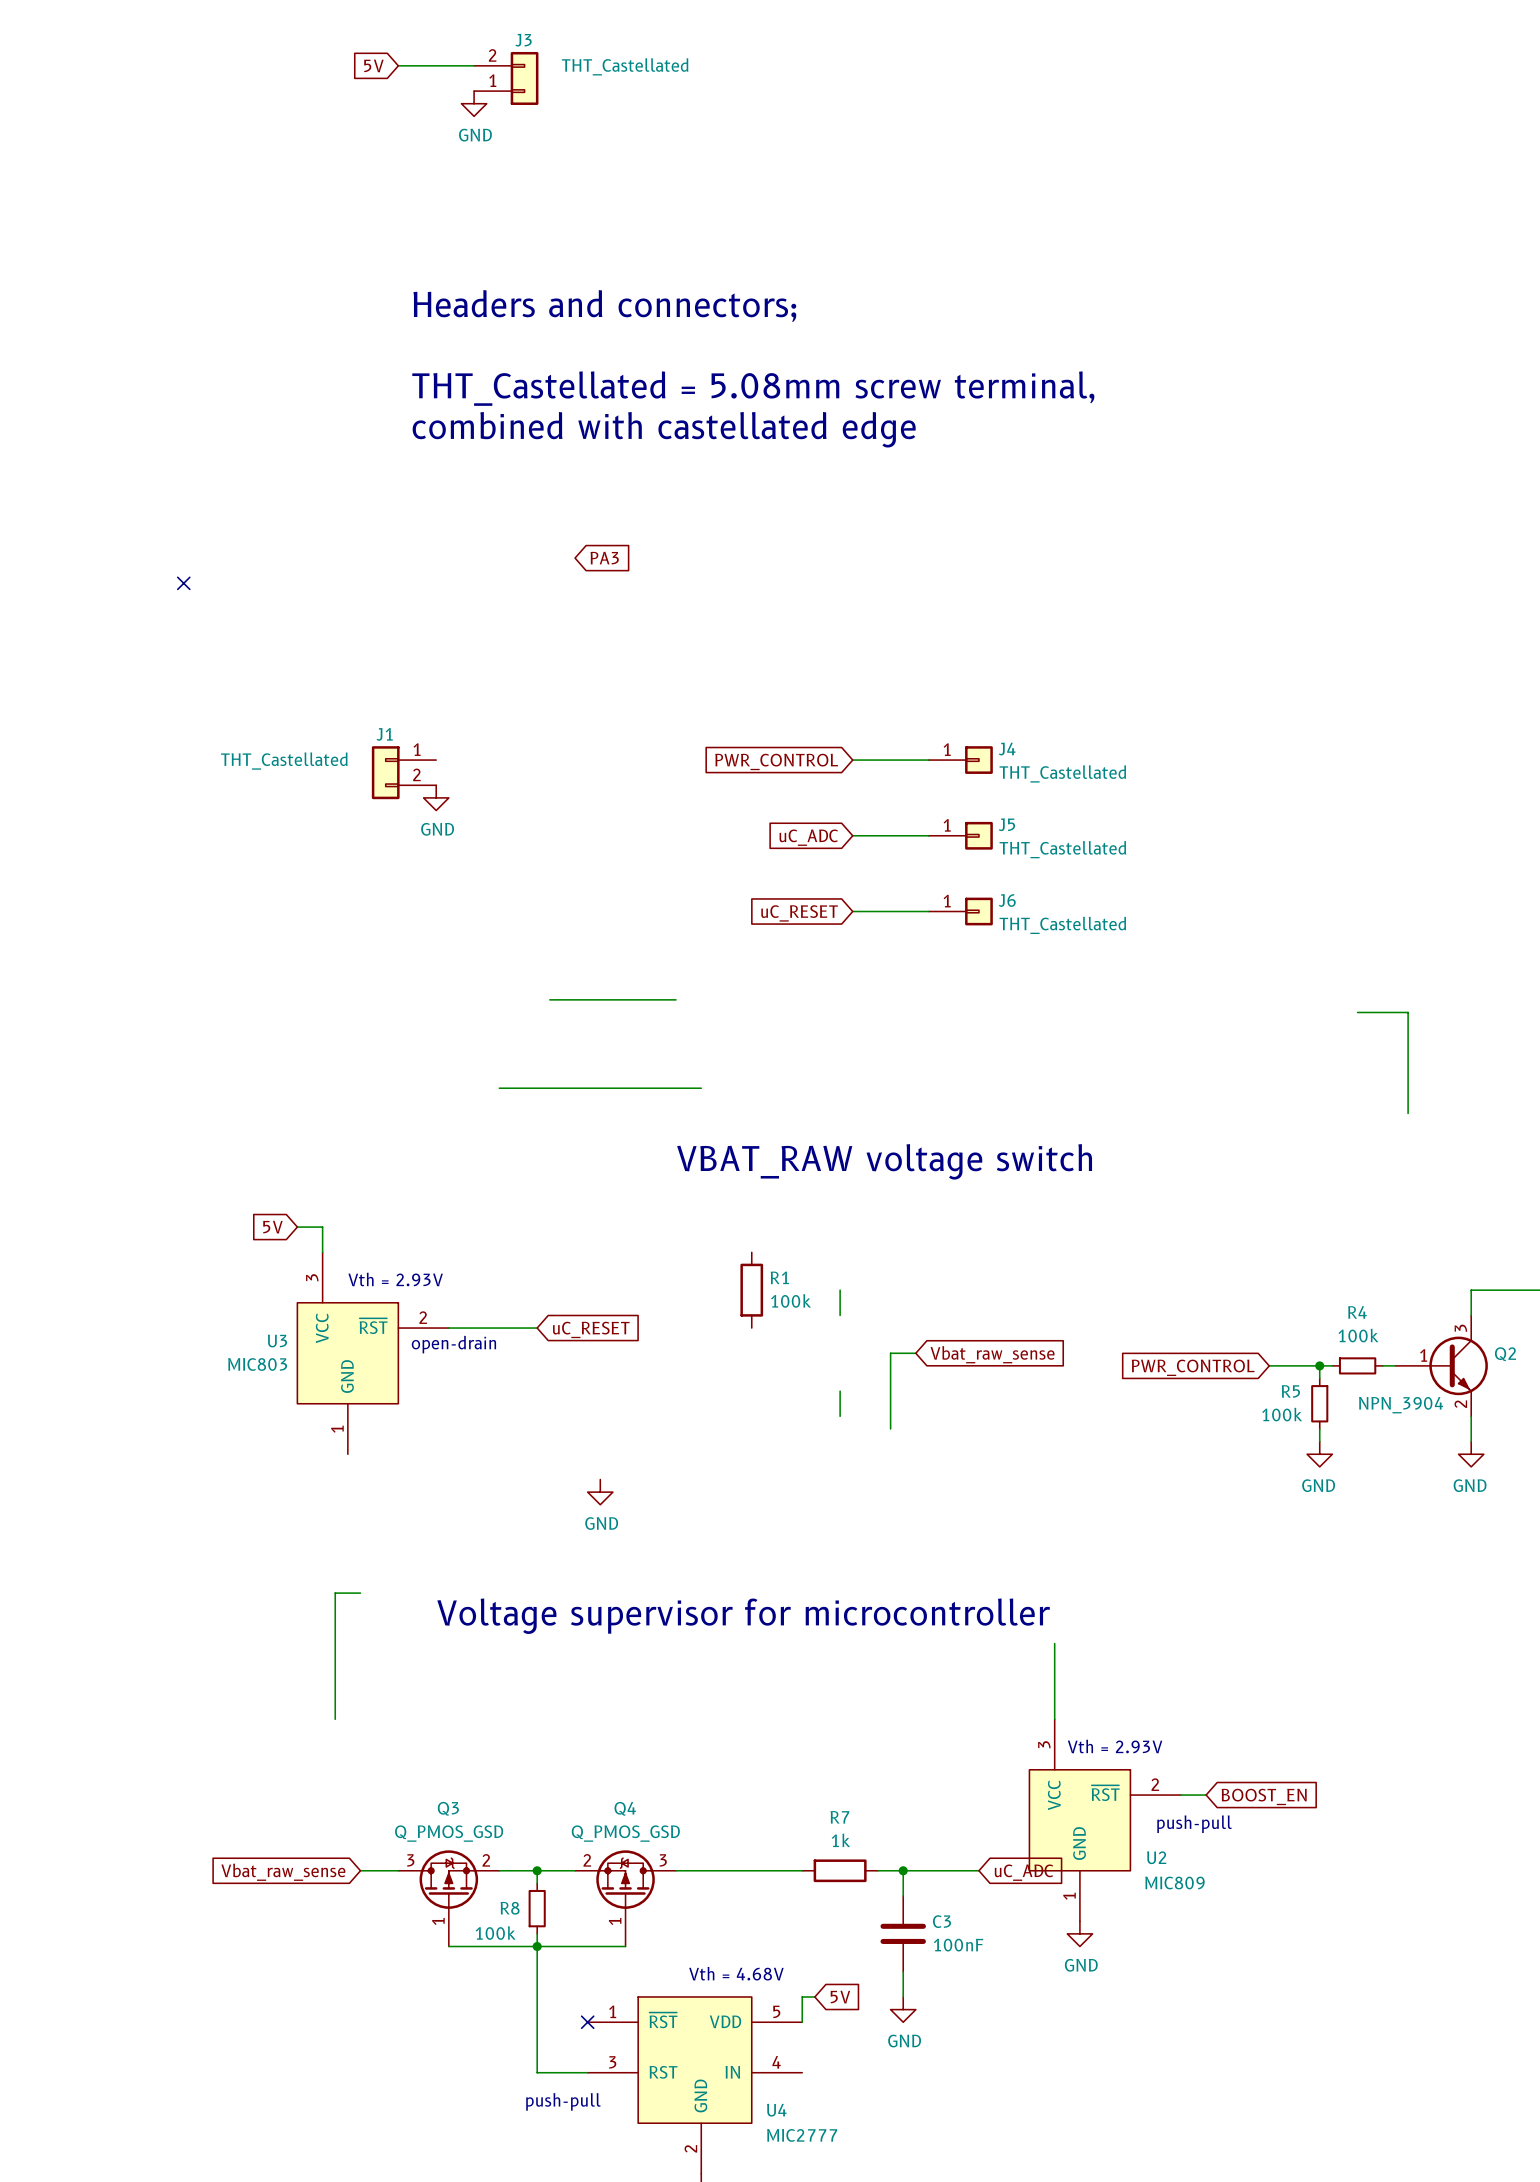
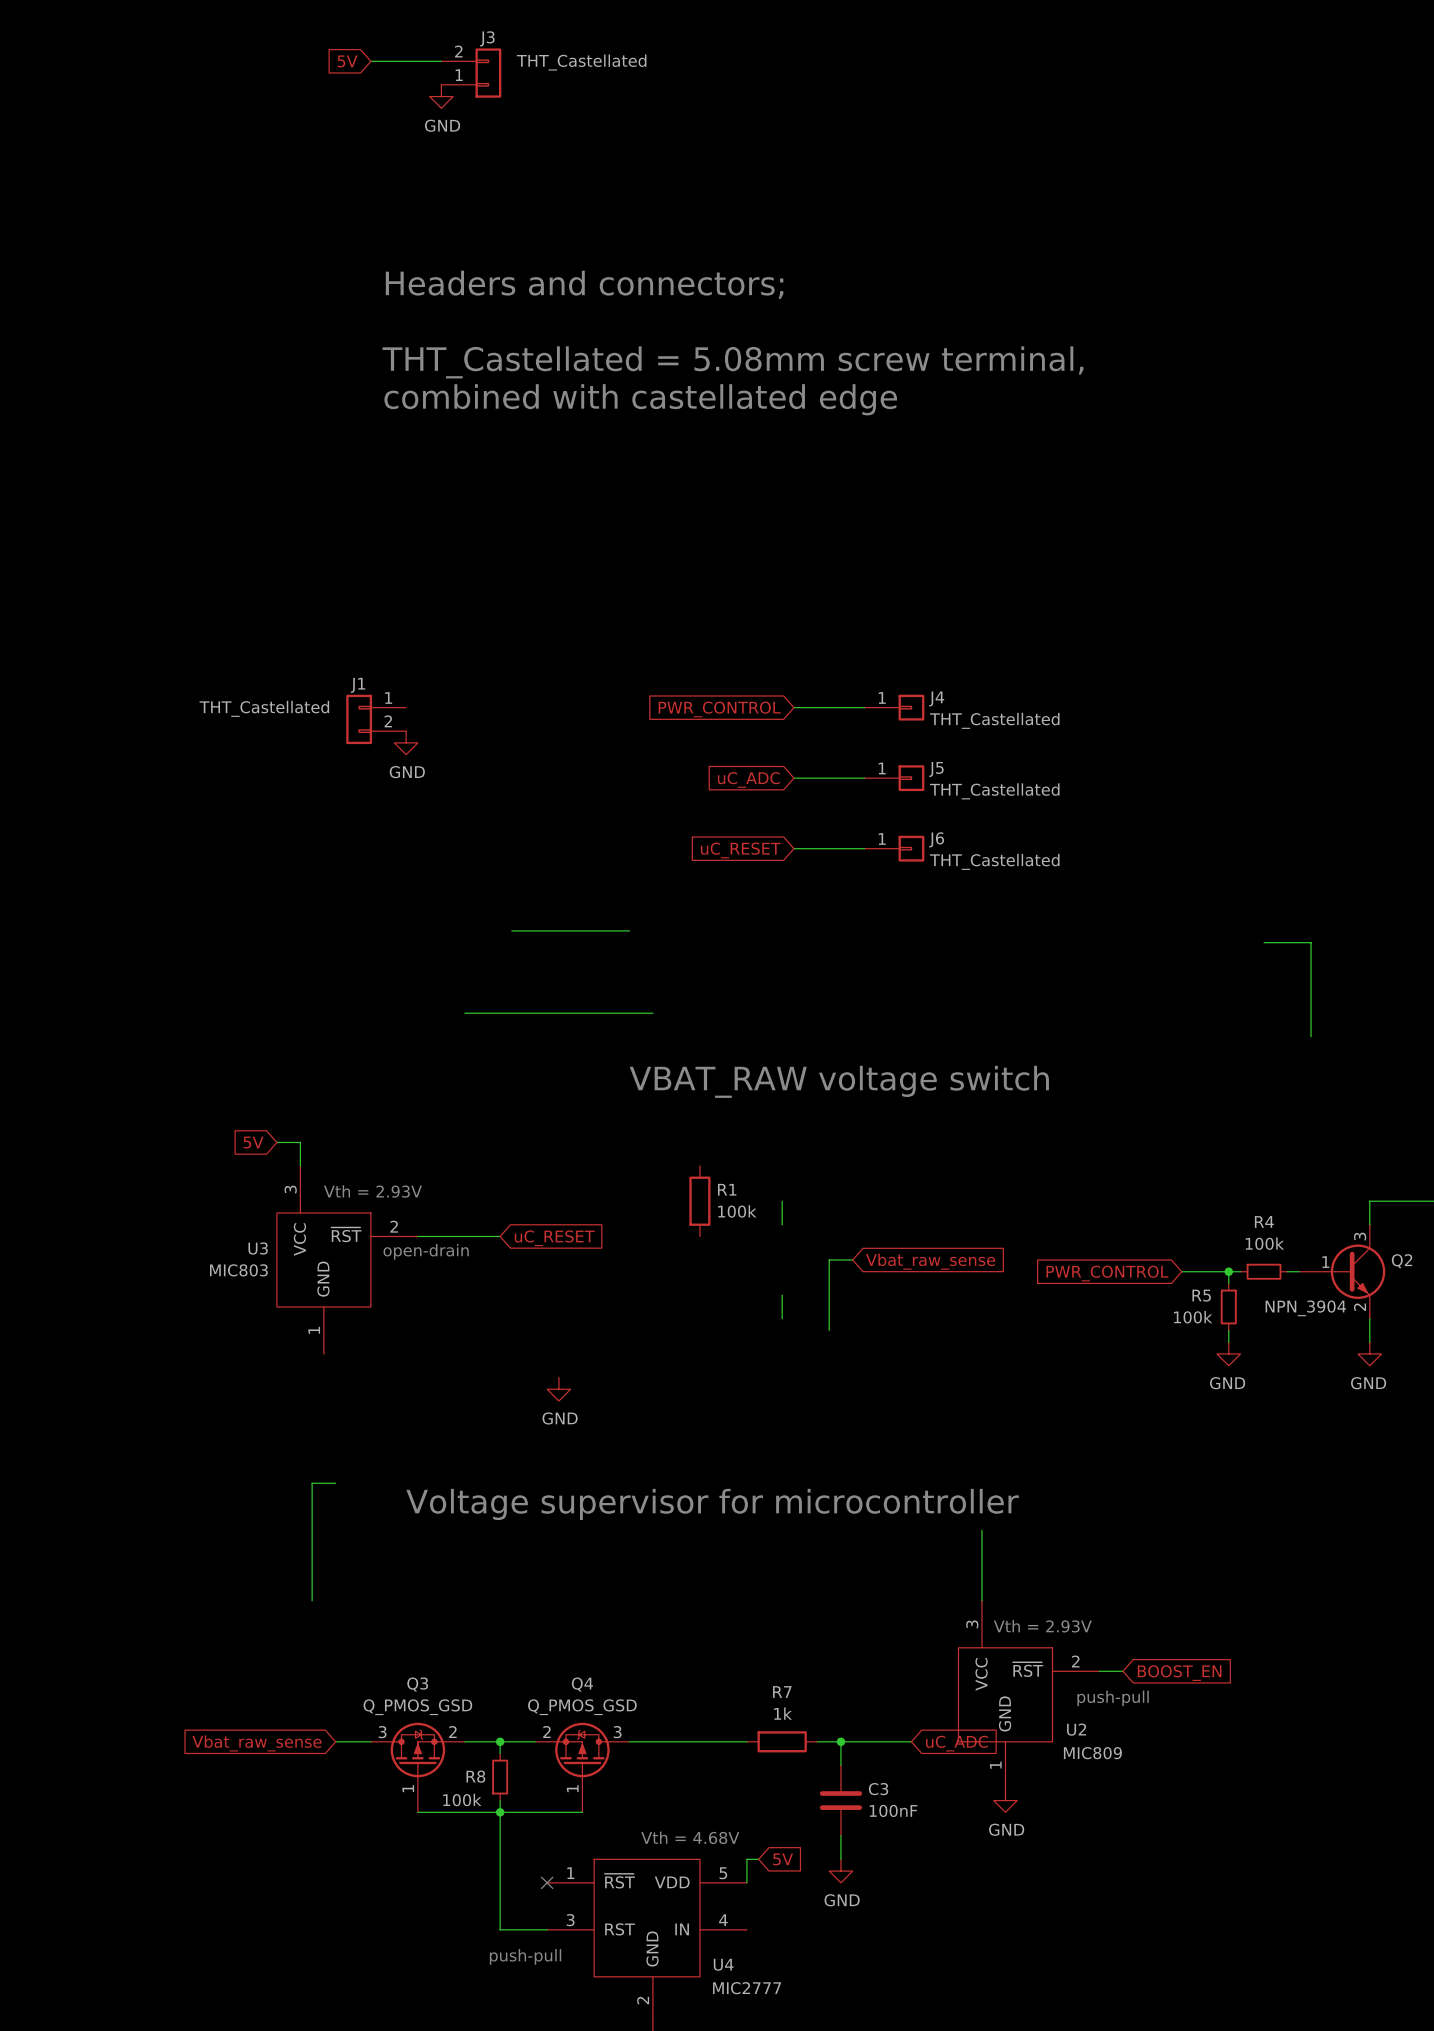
global label: PA3 (604, 558) -> none
no-connect mark: (183, 583) -> none

